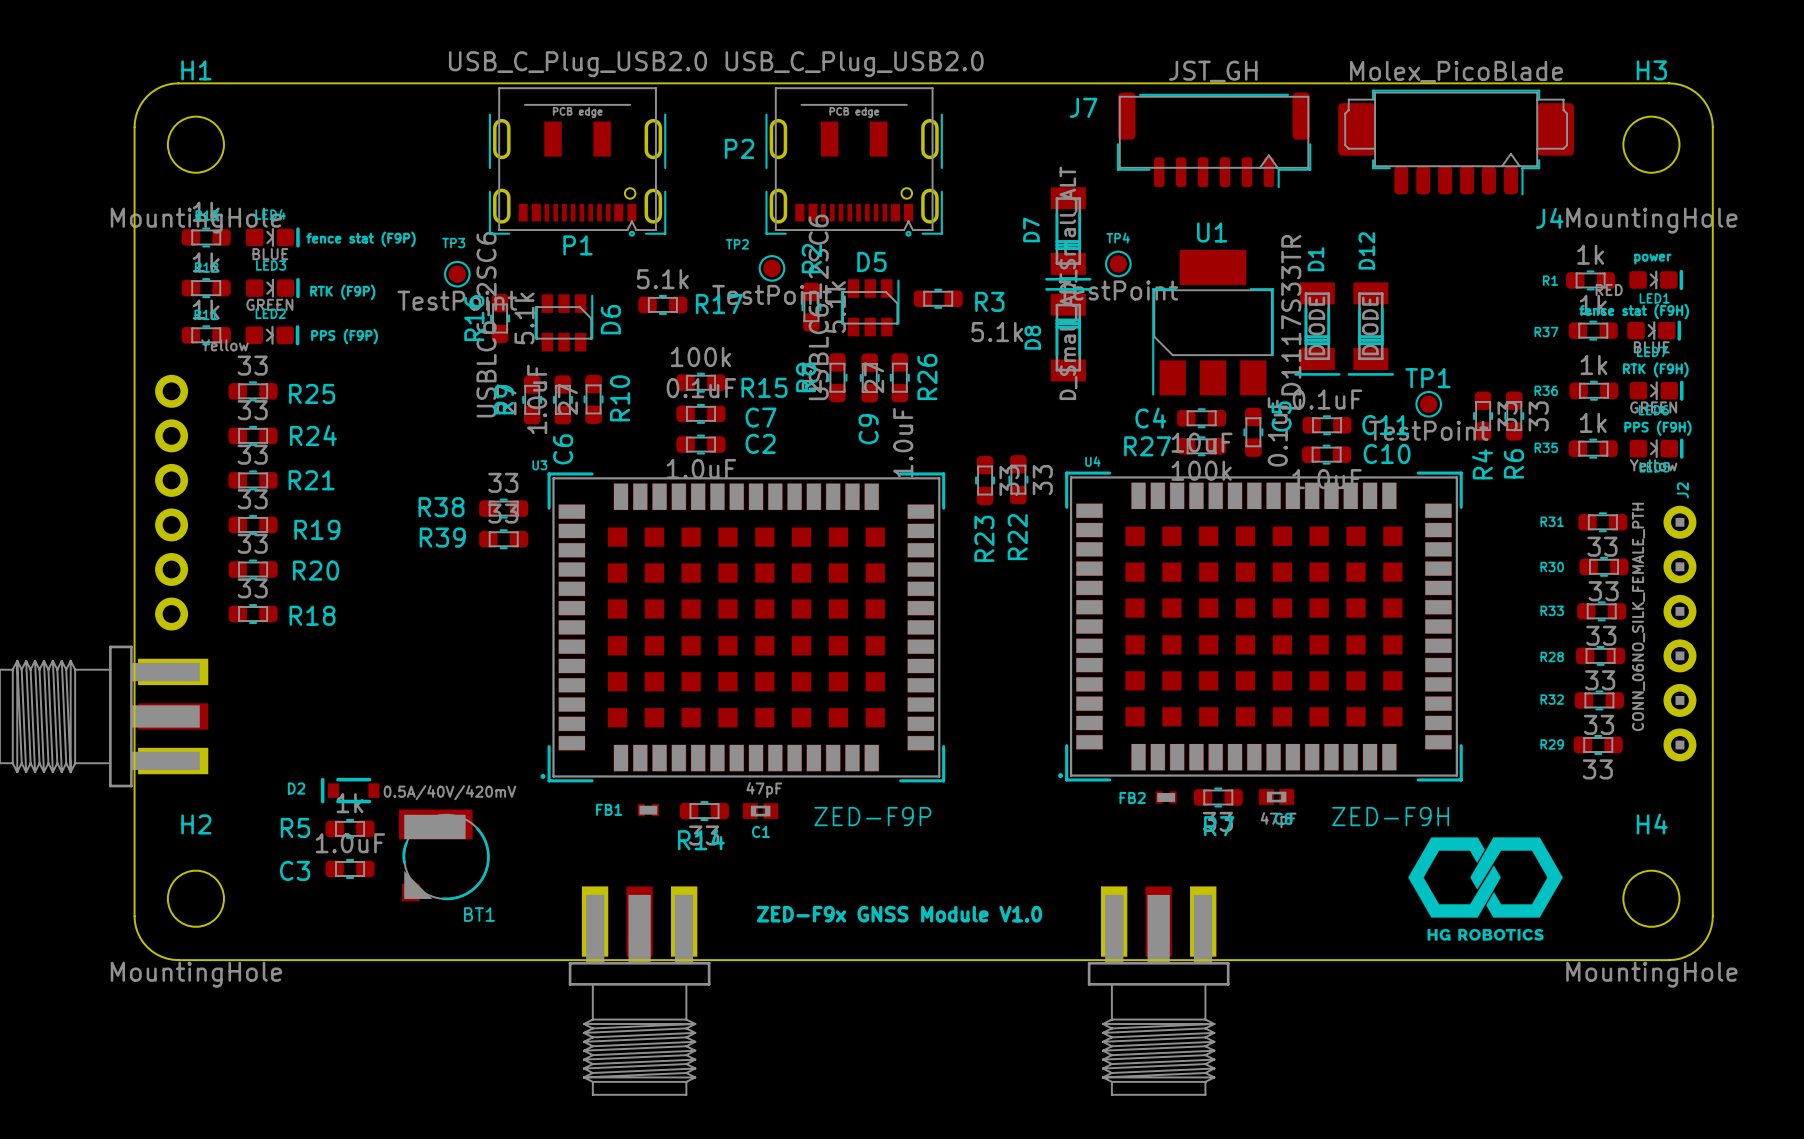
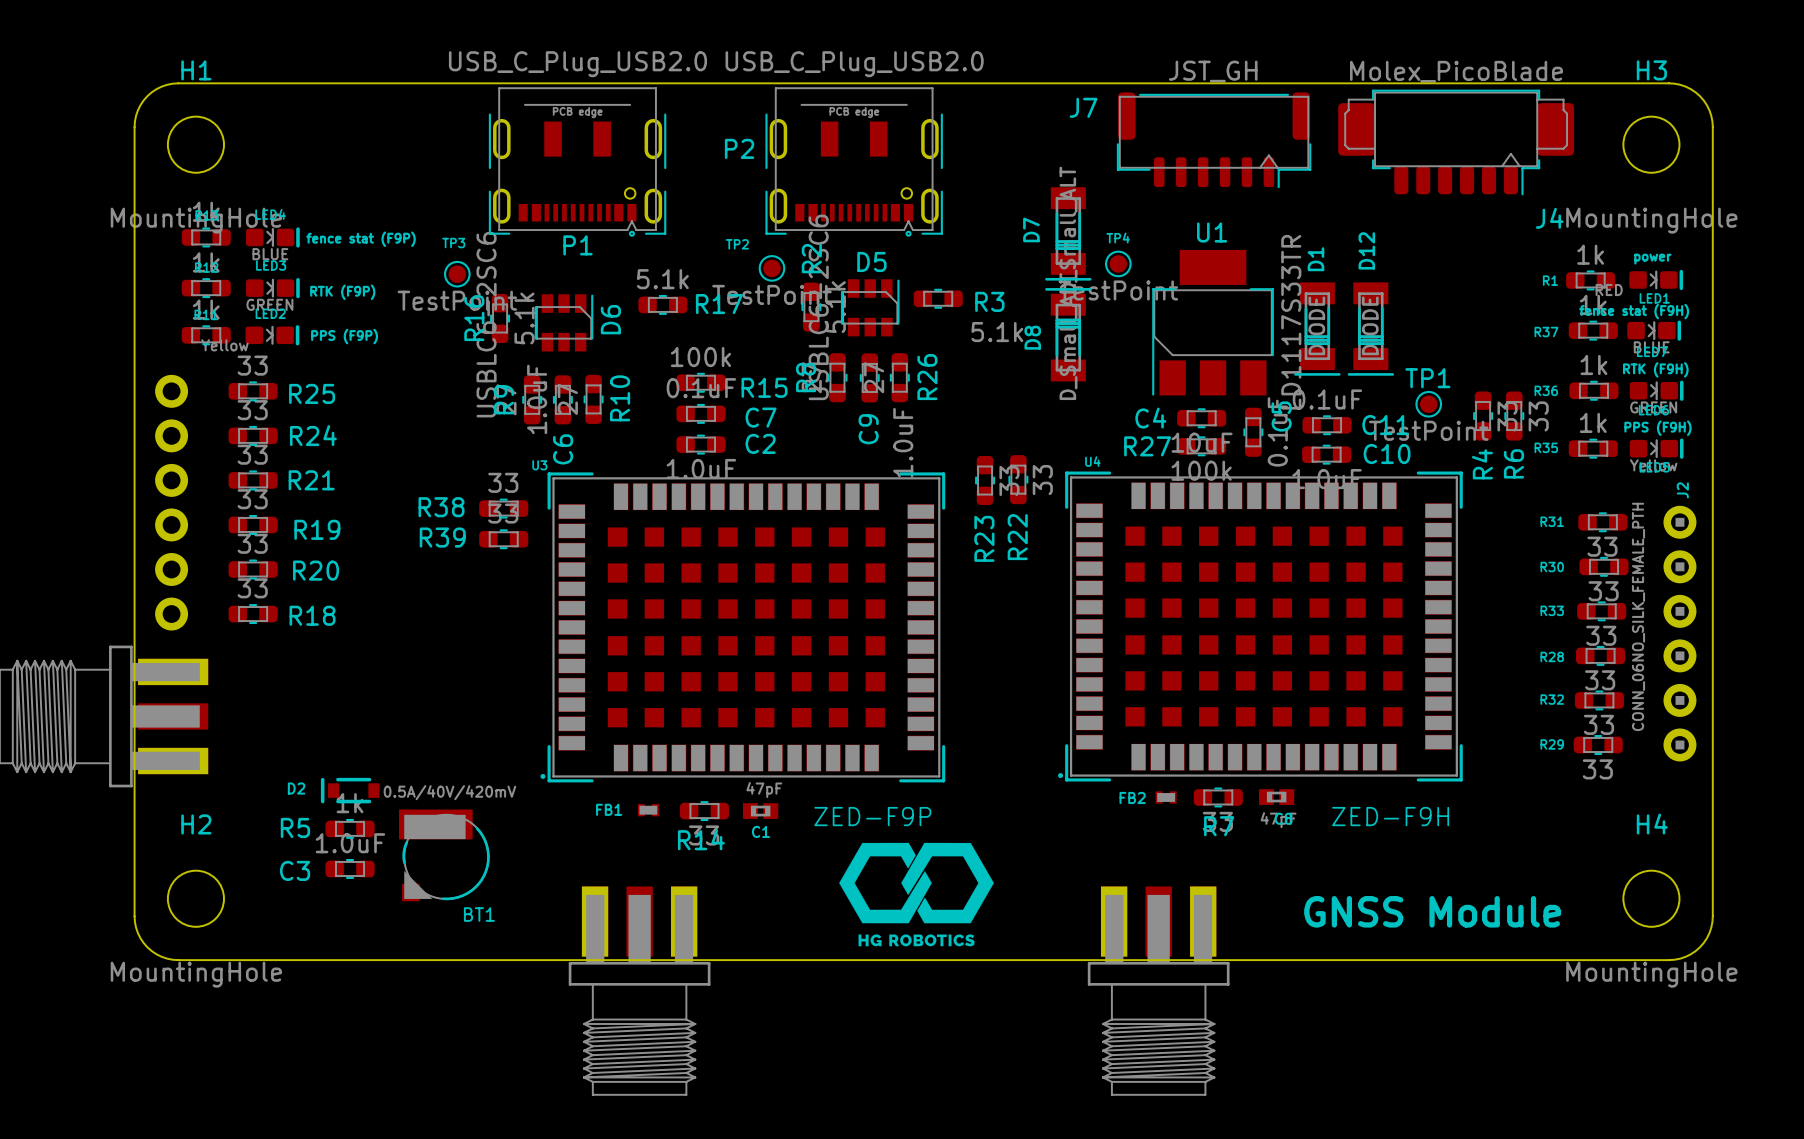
drawing: [1408, 837, 1563, 941] -> none
drawing: none -> [839, 842, 994, 947]
text: none -> GNSS Module (1432, 911)
text: ZED-F9x GNSS Module V1.0 (899, 914) -> none

